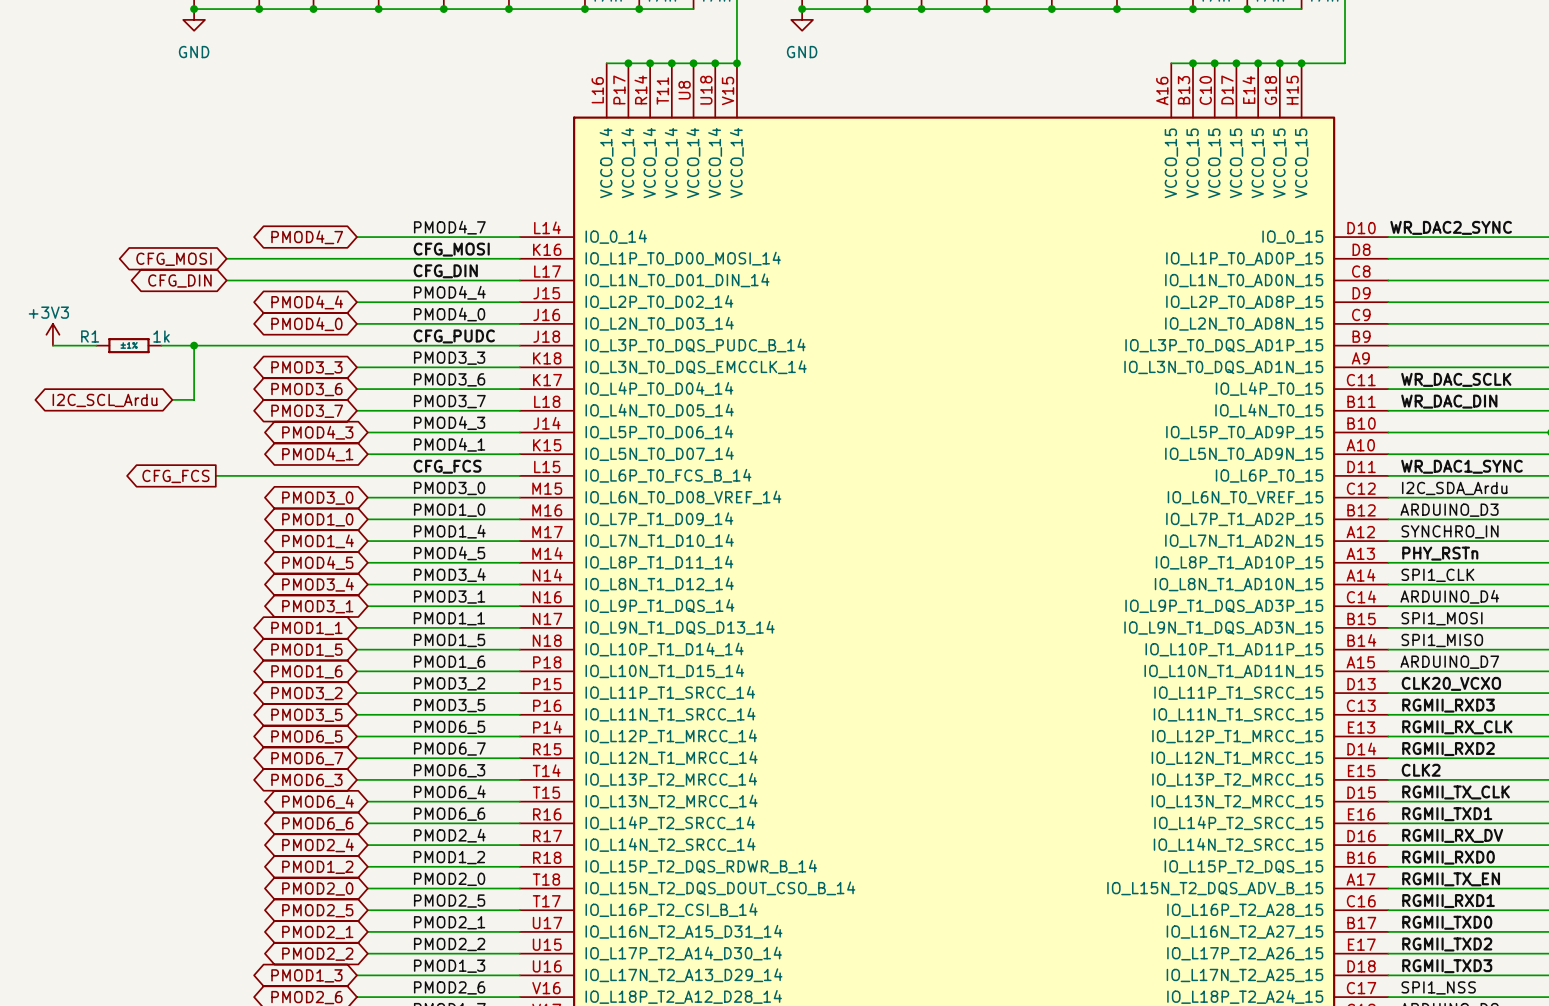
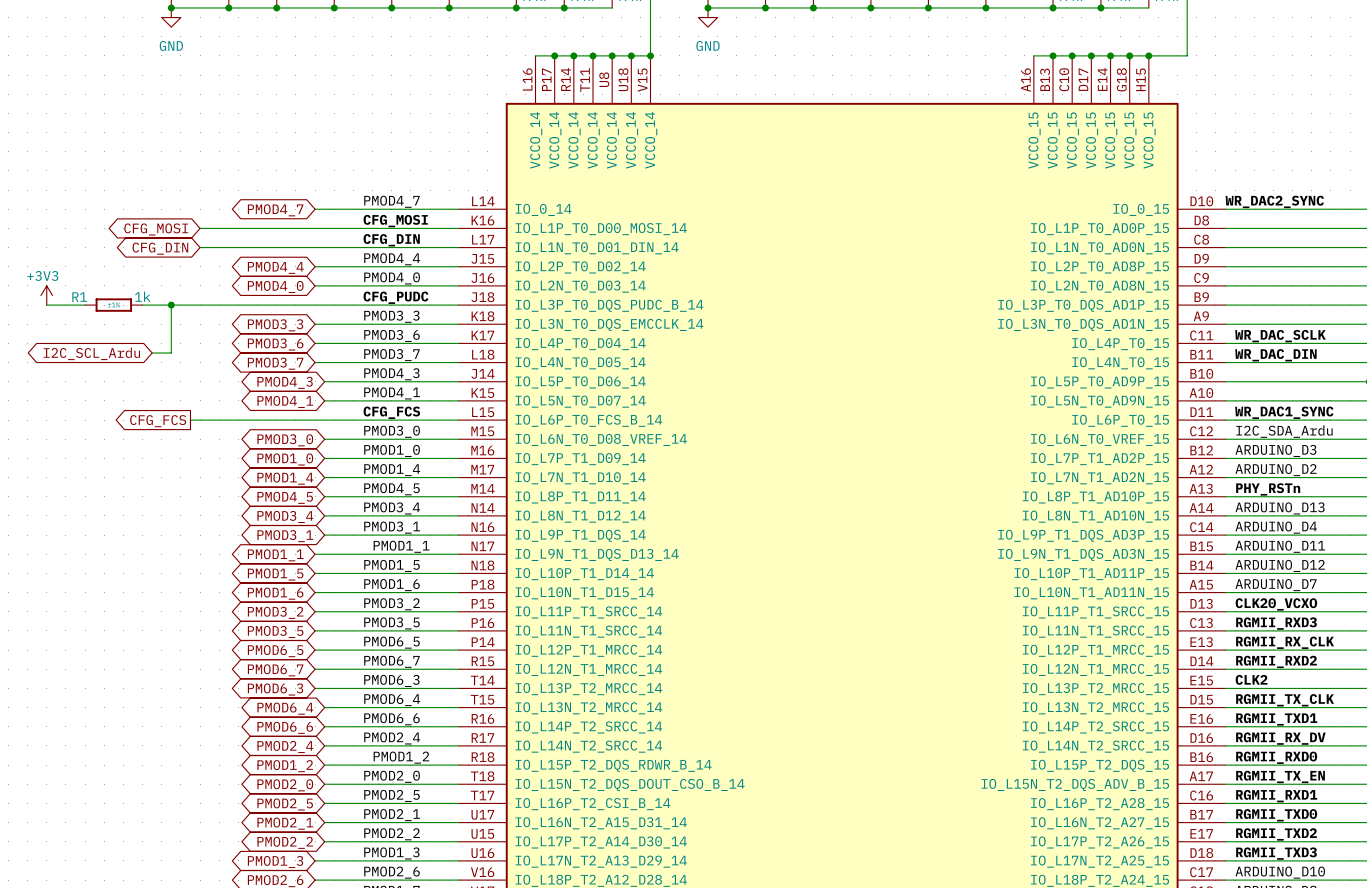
label: SYNCHRO_IN (1450, 531) -> ARDUINO_D2 (1276, 470)
label: SPI1_CLK (1437, 575) -> ARDUINO_D13 (1280, 508)
label: SPI1_MOSI (1442, 618) -> ARDUINO_D11 (1280, 546)
label: SPI1_MISO (1442, 640) -> ARDUINO_D12 (1280, 565)
label: SPI1_NSS (1438, 987) -> ARDUINO_D10 (1280, 872)

